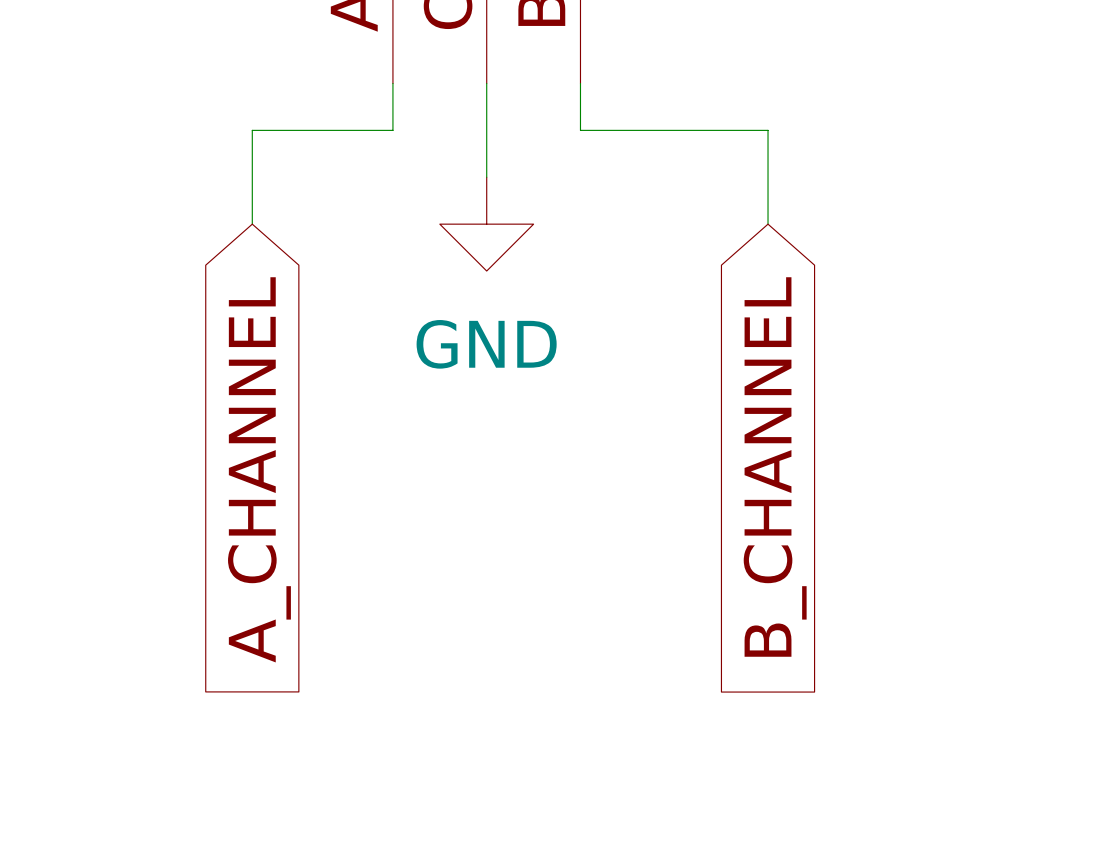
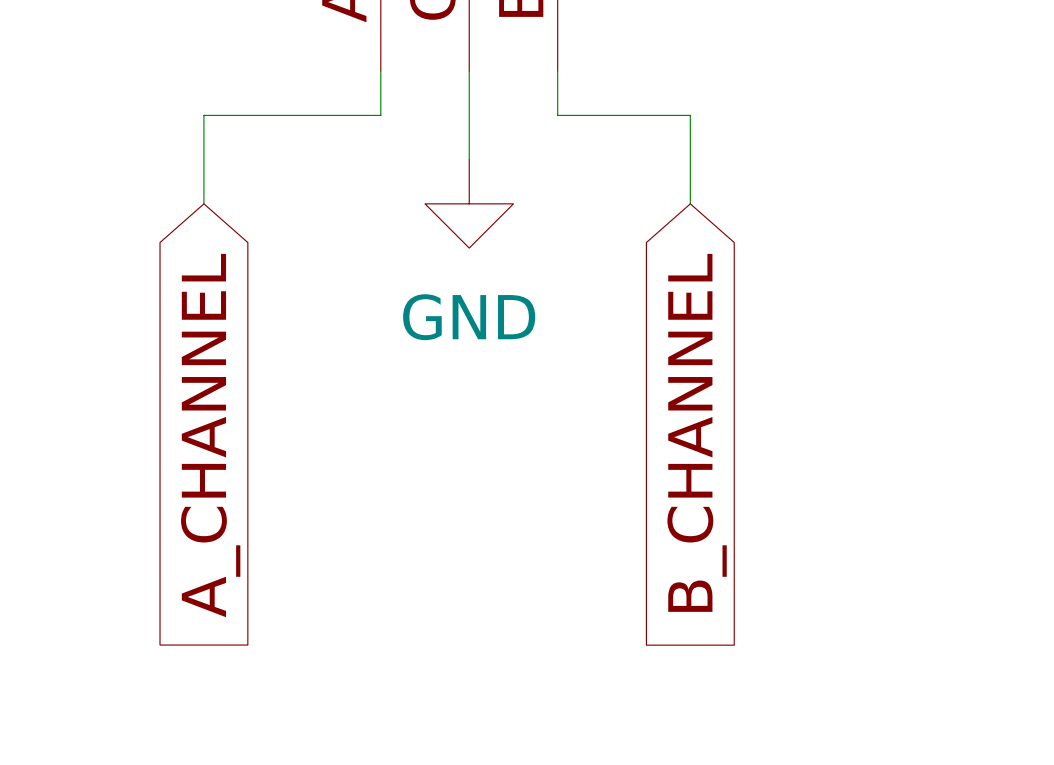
wire: (252, 130) (252, 224) -> (248, 115) (203, 115) (203, 203)
wire: (721, 130) (768, 130) (768, 224) -> (690, 115) (690, 203)
global label position: B_CHANNEL (775, 467) -> B_CHANNEL (697, 432)
global label position: A_CHANNEL (259, 469) -> A_CHANNEL (210, 435)

